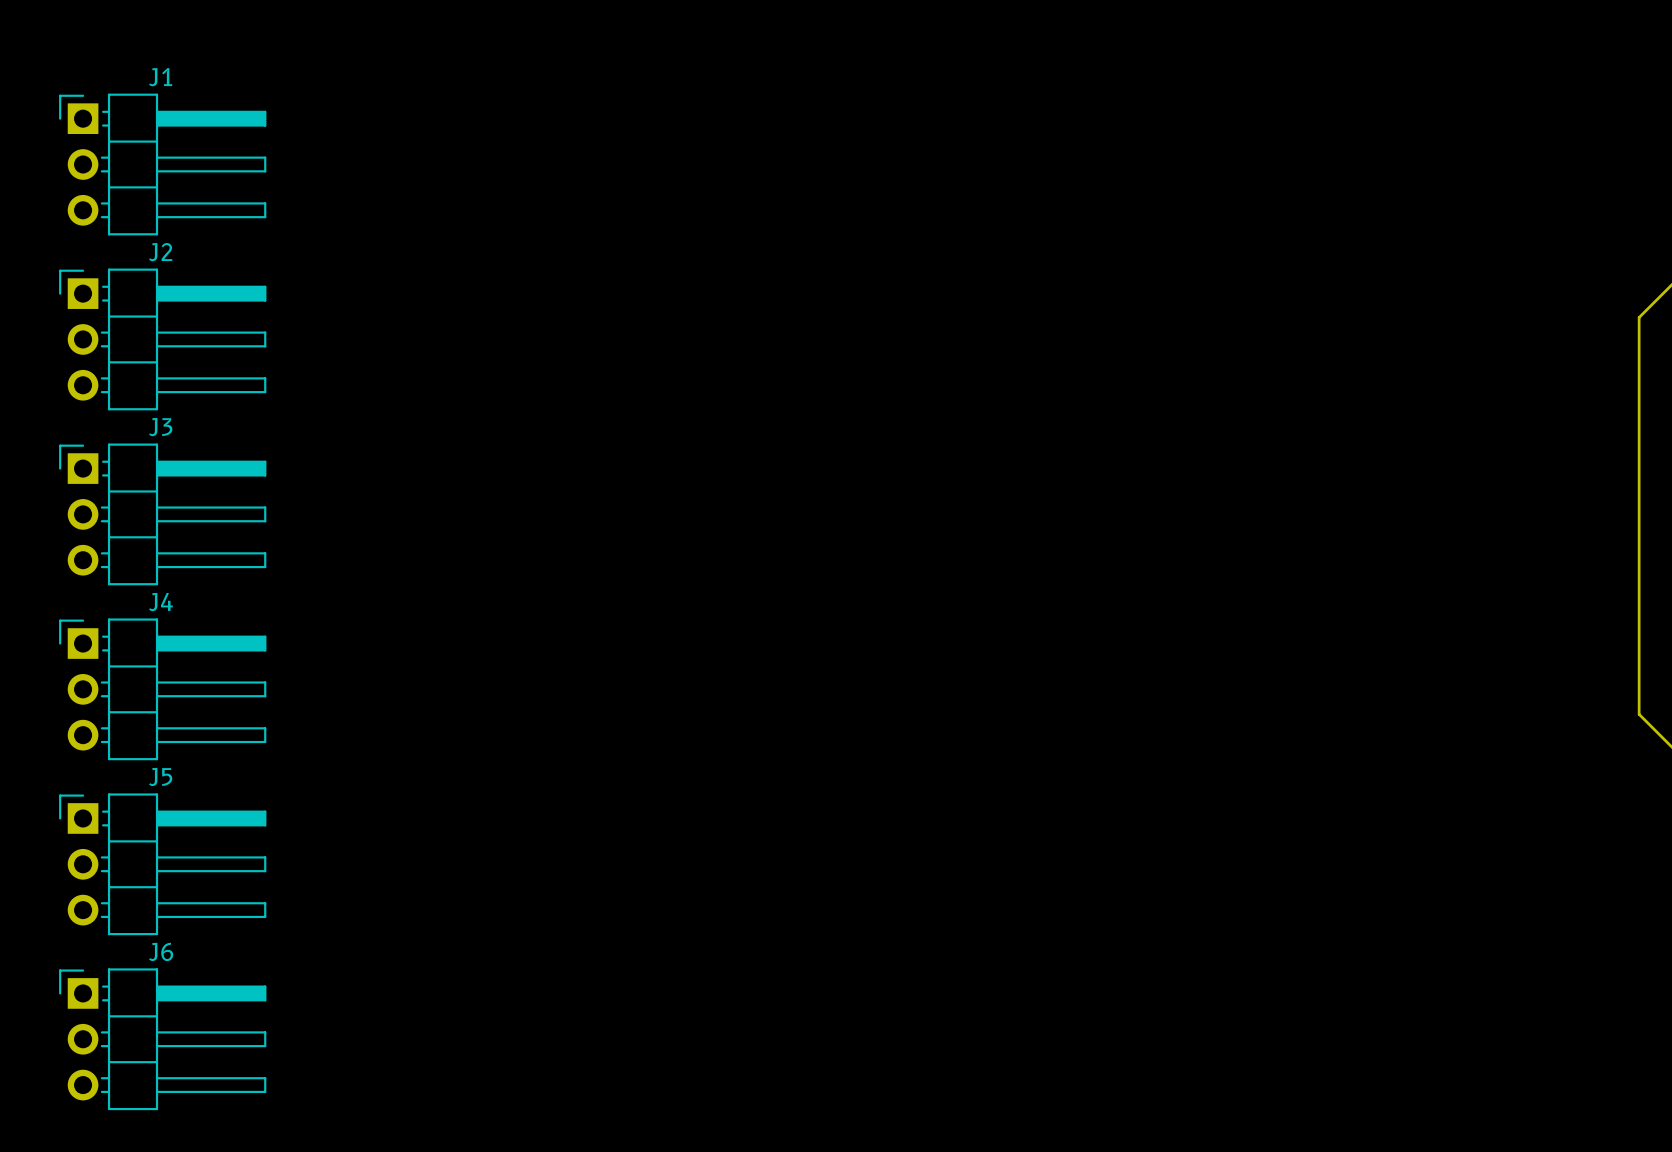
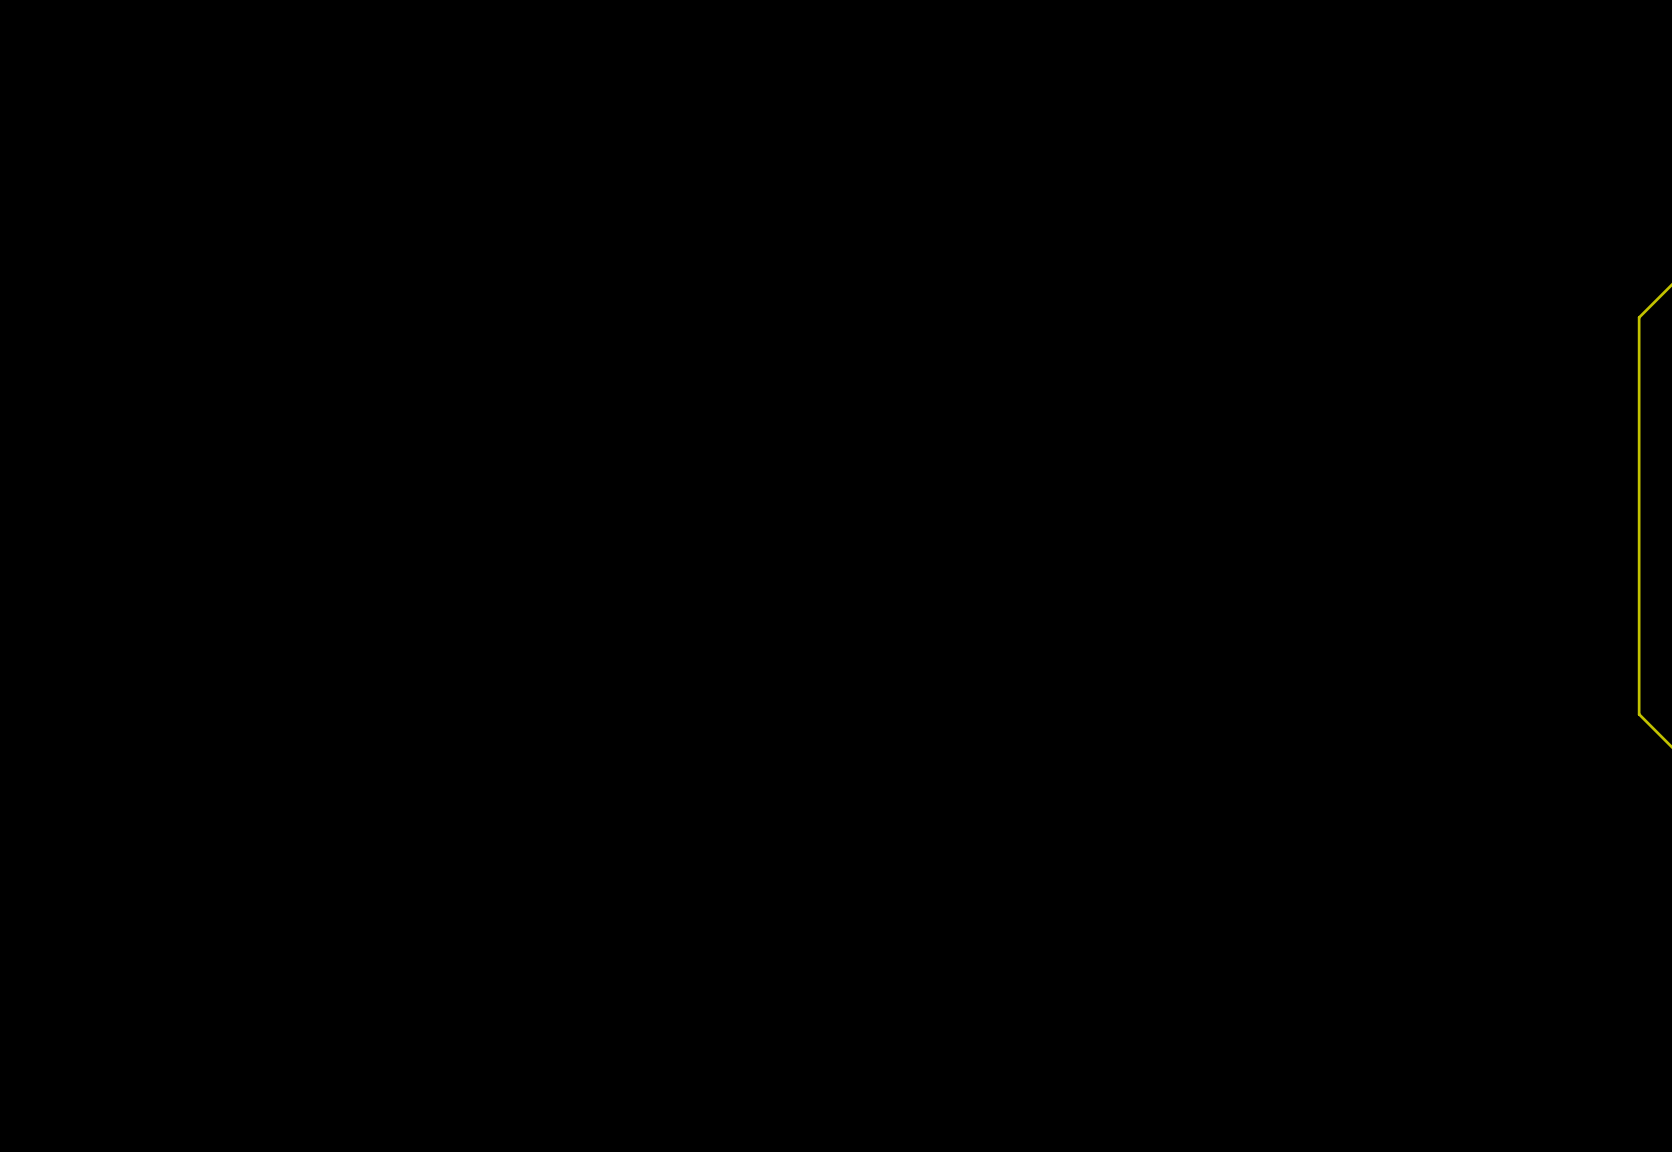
J1: (162, 164) -> none
J2: (162, 339) -> none
J3: (162, 514) -> none
J4: (162, 689) -> none
J5: (162, 864) -> none
J6: (162, 1039) -> none

